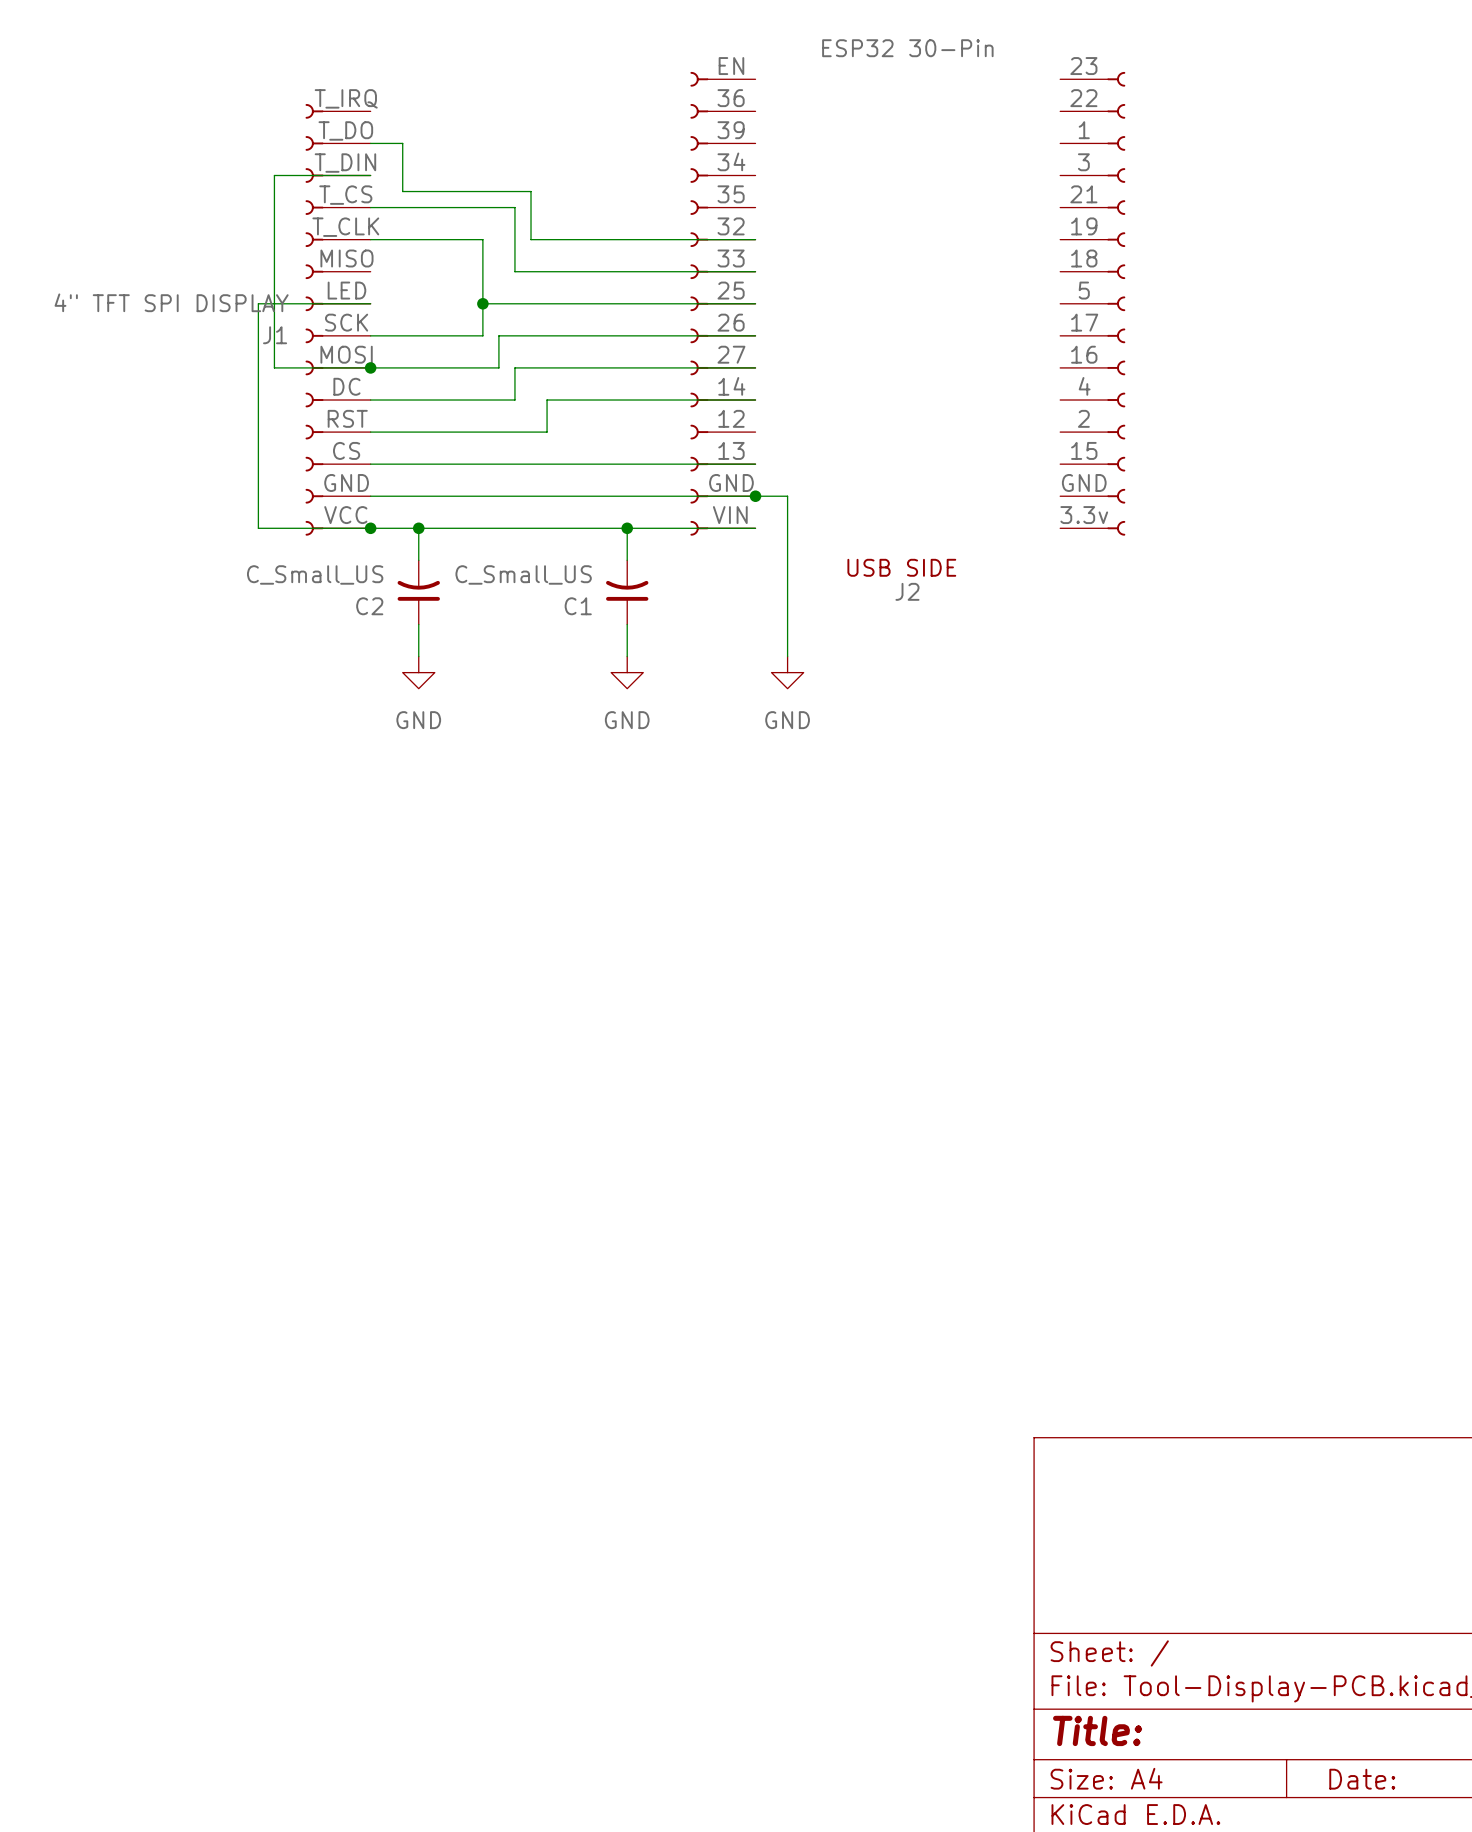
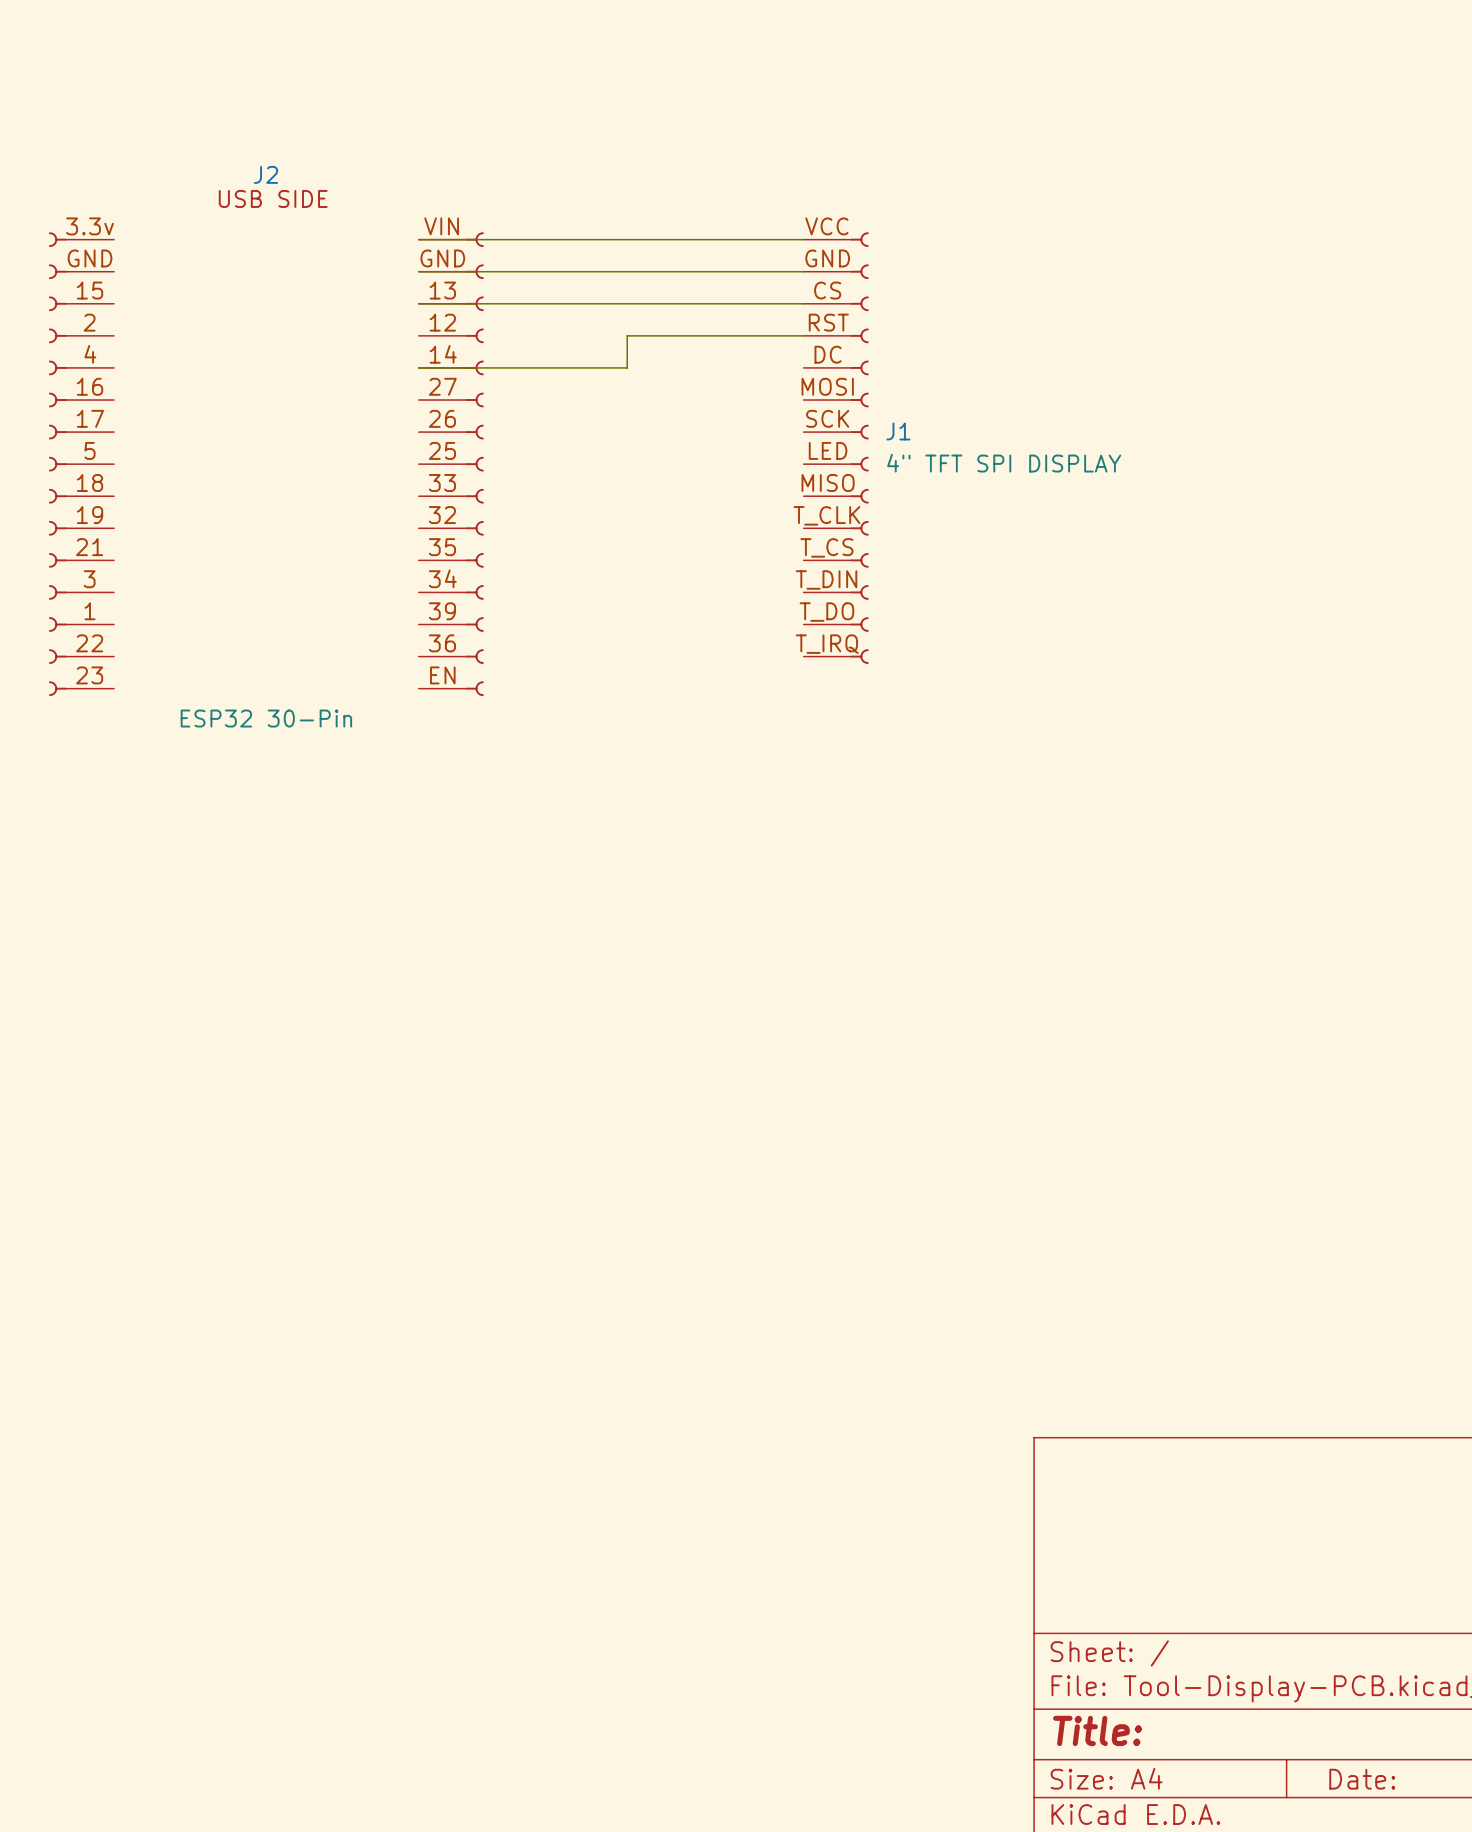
wire: (370, 143) (402, 143) (402, 191) (531, 191) (531, 239) -> (482, 239) (531, 239)
wire: (370, 175) (274, 175) (274, 367) (418, 367) -> none
wire: (370, 207) (514, 207) (514, 271) -> (418, 271) (514, 271)
wire: (370, 239) (418, 239) -> none
wire: (482, 239) (482, 335) (370, 335) -> none
wire: none -> (755, 239) (803, 239)
wire: none -> (755, 271) (803, 271)
wire: (370, 303) (258, 303) (258, 528) (755, 528) -> none
wire: none -> (418, 303) (482, 303)
junction: (482, 303) -> none
wire: none -> (755, 303) (803, 303)
J2 rotation: 0° (907, 303) -> 180° (266, 464)
J2 position: (907, 303) -> (266, 464)
J1 rotation: 0° (314, 319) -> 180° (859, 448)
J1 position: (338, 319) -> (836, 448)
wire: (627, 335) (498, 335) (498, 367) -> (514, 367) (498, 367)
wire: none -> (755, 335) (803, 335)
junction: (370, 367) -> none
wire: (514, 367) (514, 400) (370, 400) -> none
wire: (627, 367) (755, 367) -> (627, 367) (627, 335)
wire: (755, 400) (547, 400) (547, 432) (370, 432) -> none
wire: (370, 464) (755, 464) -> none
wire: (370, 496) (787, 496) (787, 656) -> none
junction: (755, 496) -> none
junction: (370, 528) -> none
wire: (418, 528) (418, 560) -> none
junction: (418, 528) -> none
wire: (627, 528) (627, 560) -> none
junction: (627, 528) -> none
C2: C_Small_US (418, 592) -> none
C1: C_Small_US (627, 592) -> none
wire: (418, 624) (418, 656) -> none
wire: (627, 624) (627, 656) -> none
power symbol: GND (418, 672) -> none
power symbol: GND (627, 672) -> none
power symbol: GND (787, 672) -> none

